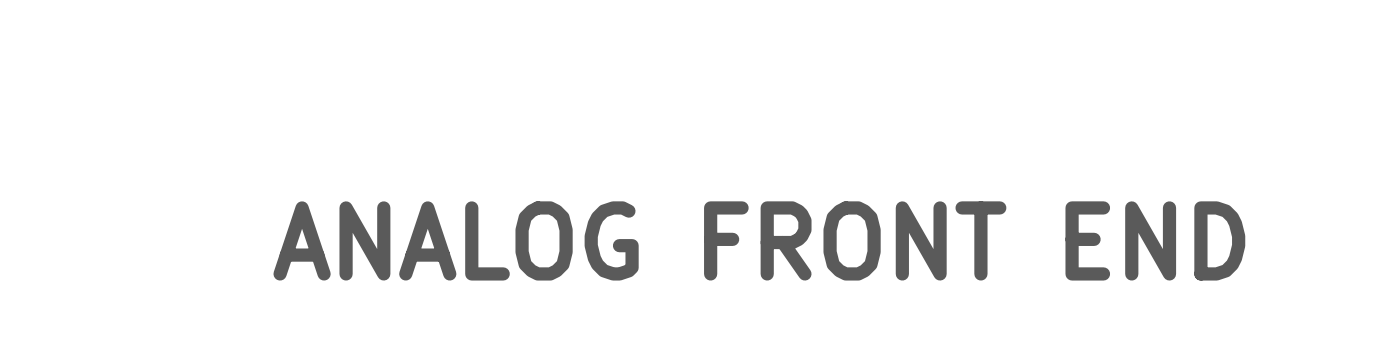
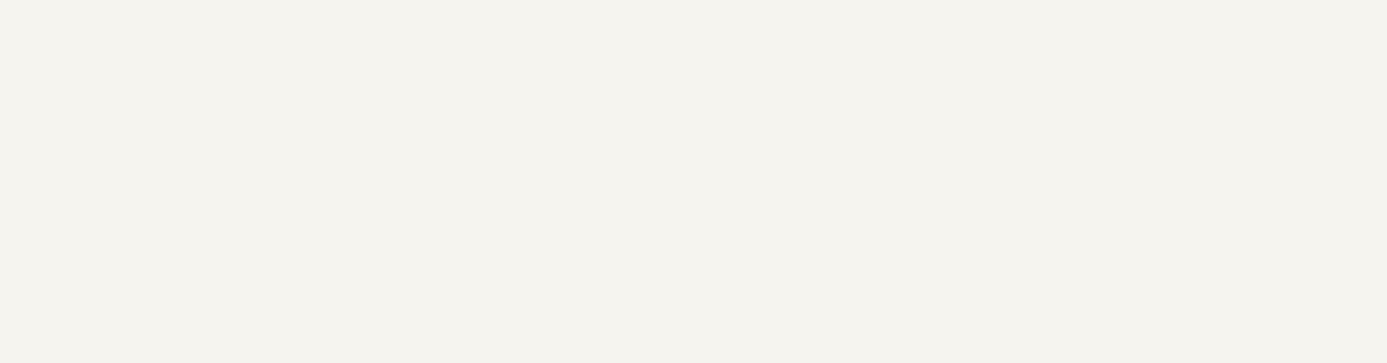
text: ANALOG FRONT END (759, 240) -> none

